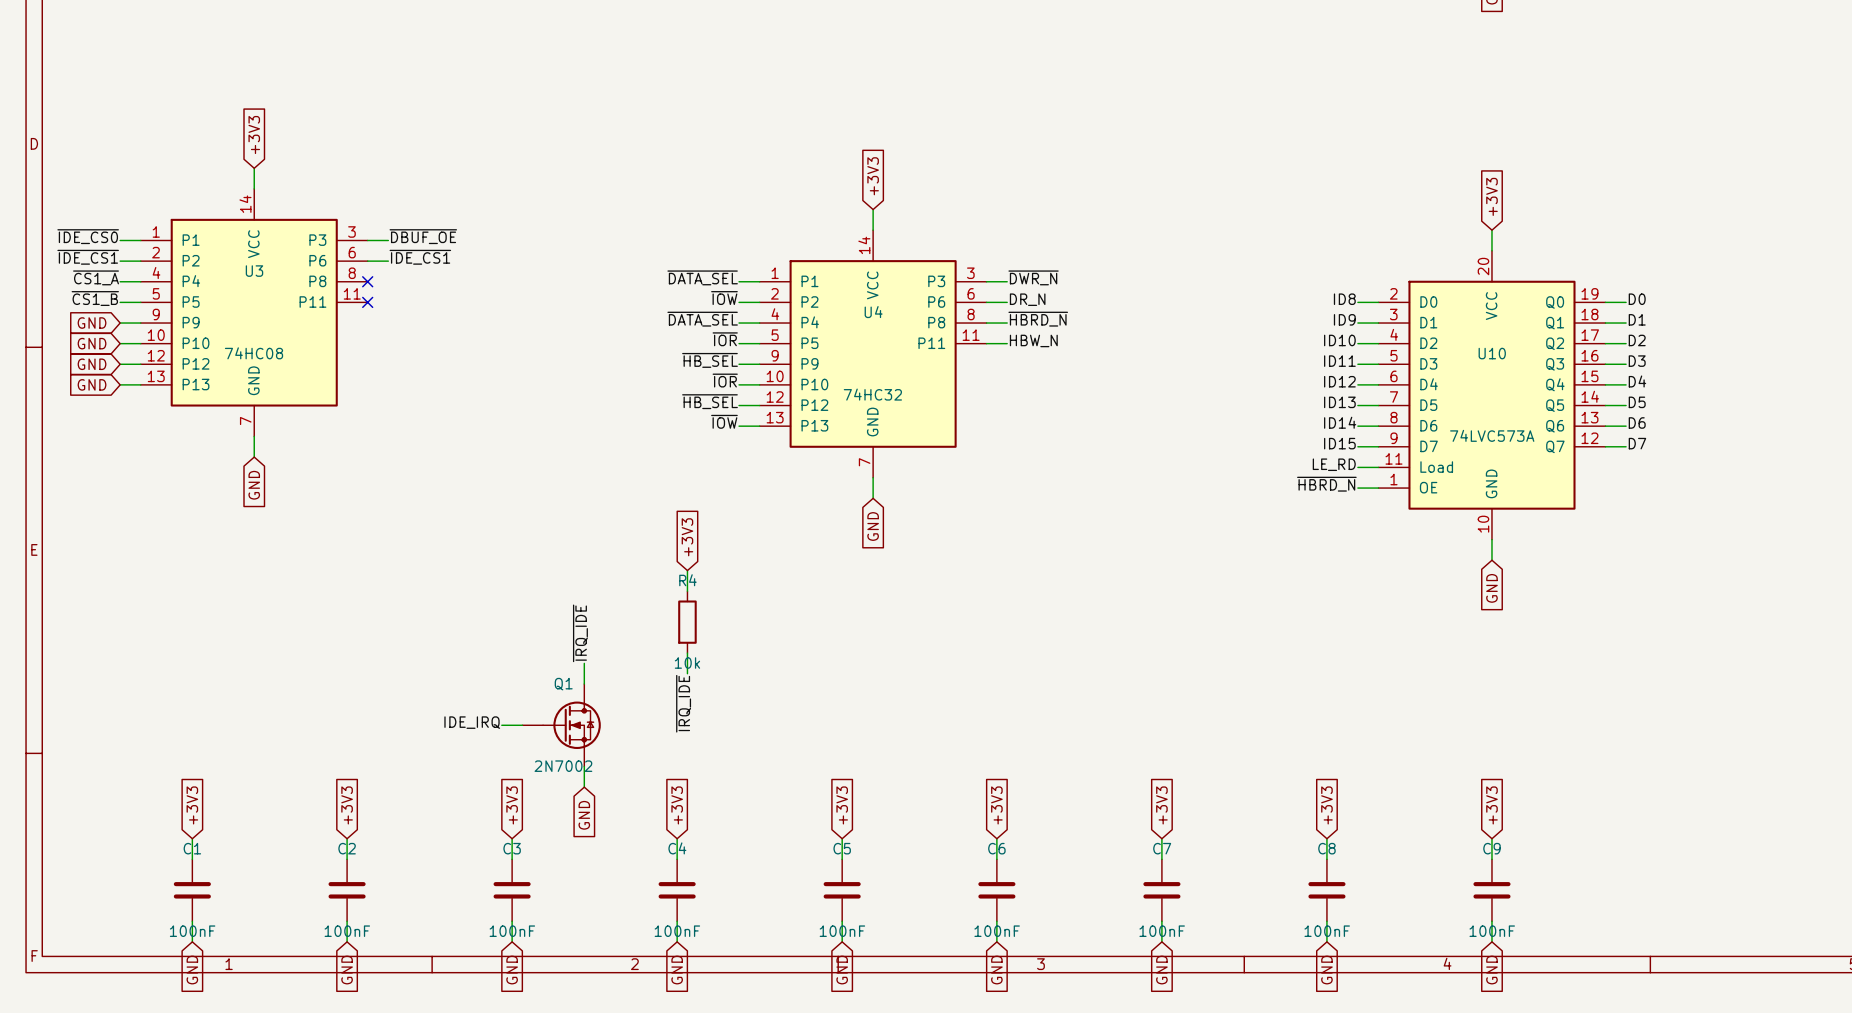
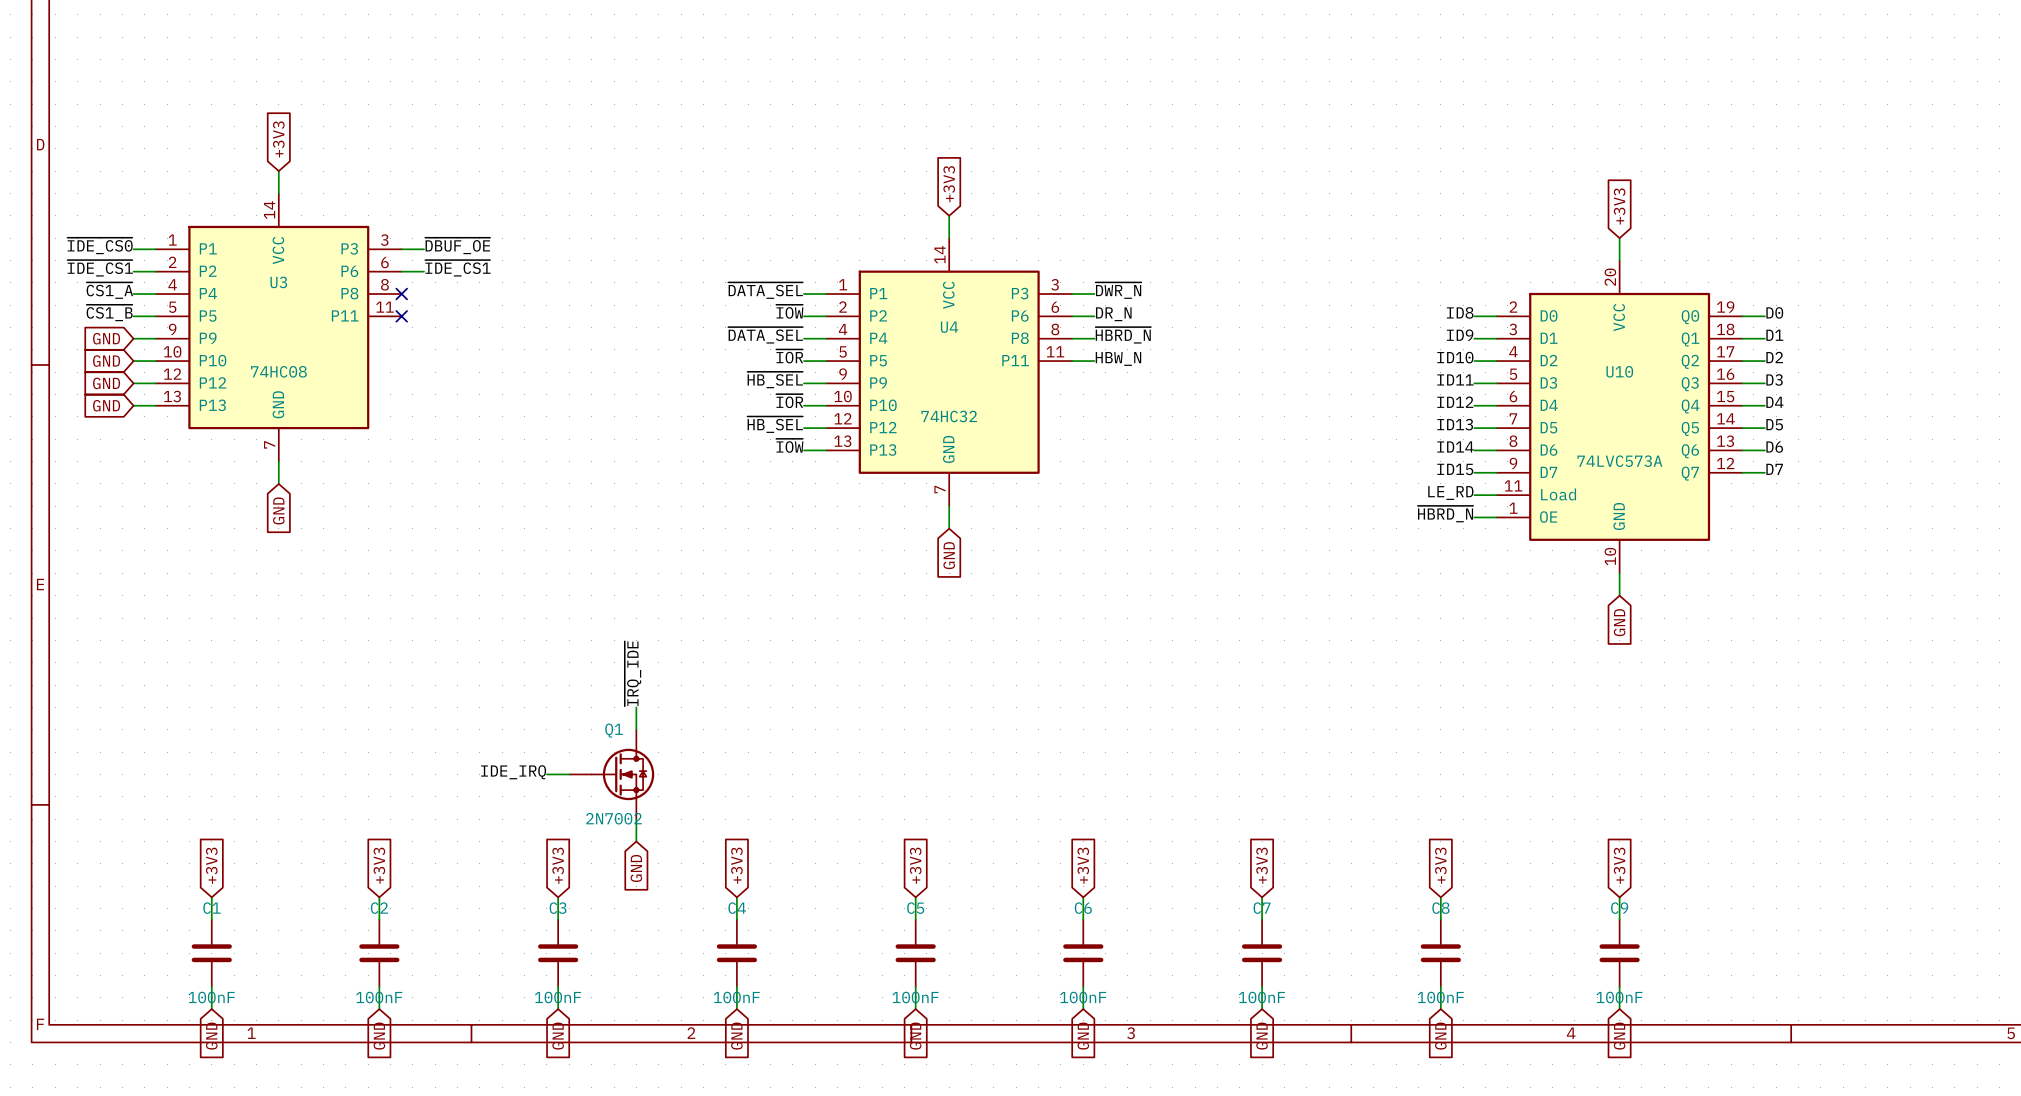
global label: +3V3 (687, 537) -> none
wire: (687, 570) (687, 591) -> none
R4: 10k (687, 622) -> none
wire: (687, 653) (687, 673) -> none
label: ~{IRQ_IDE} (683, 703) -> none

